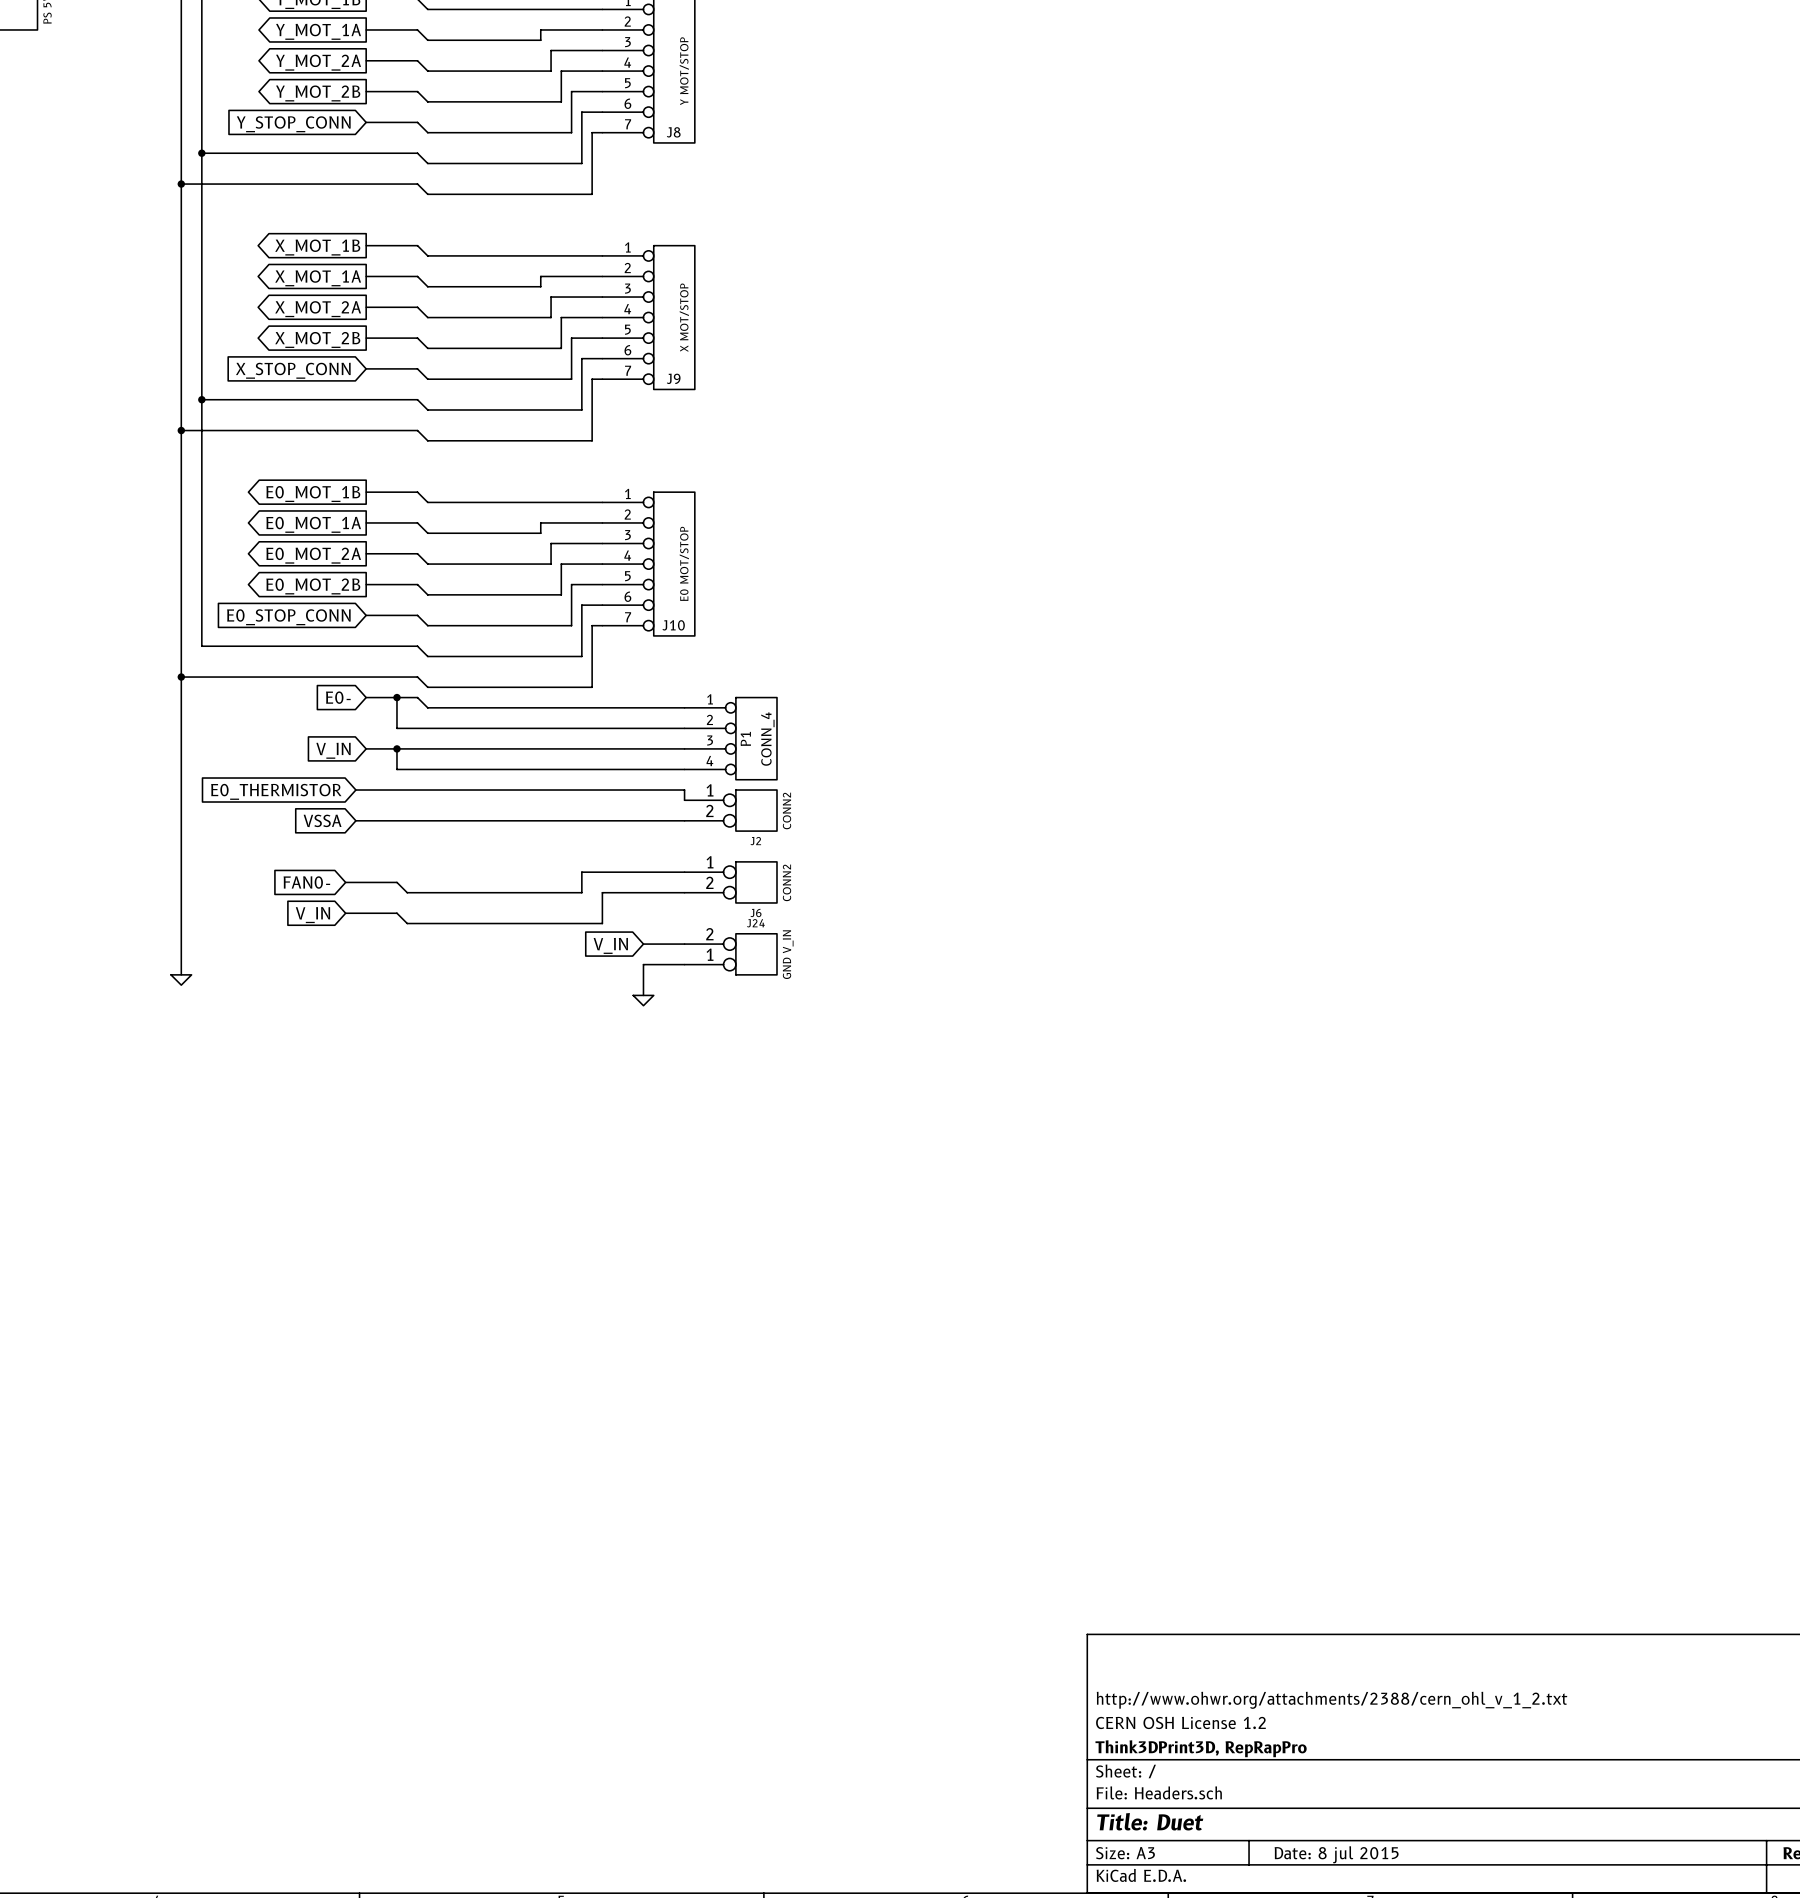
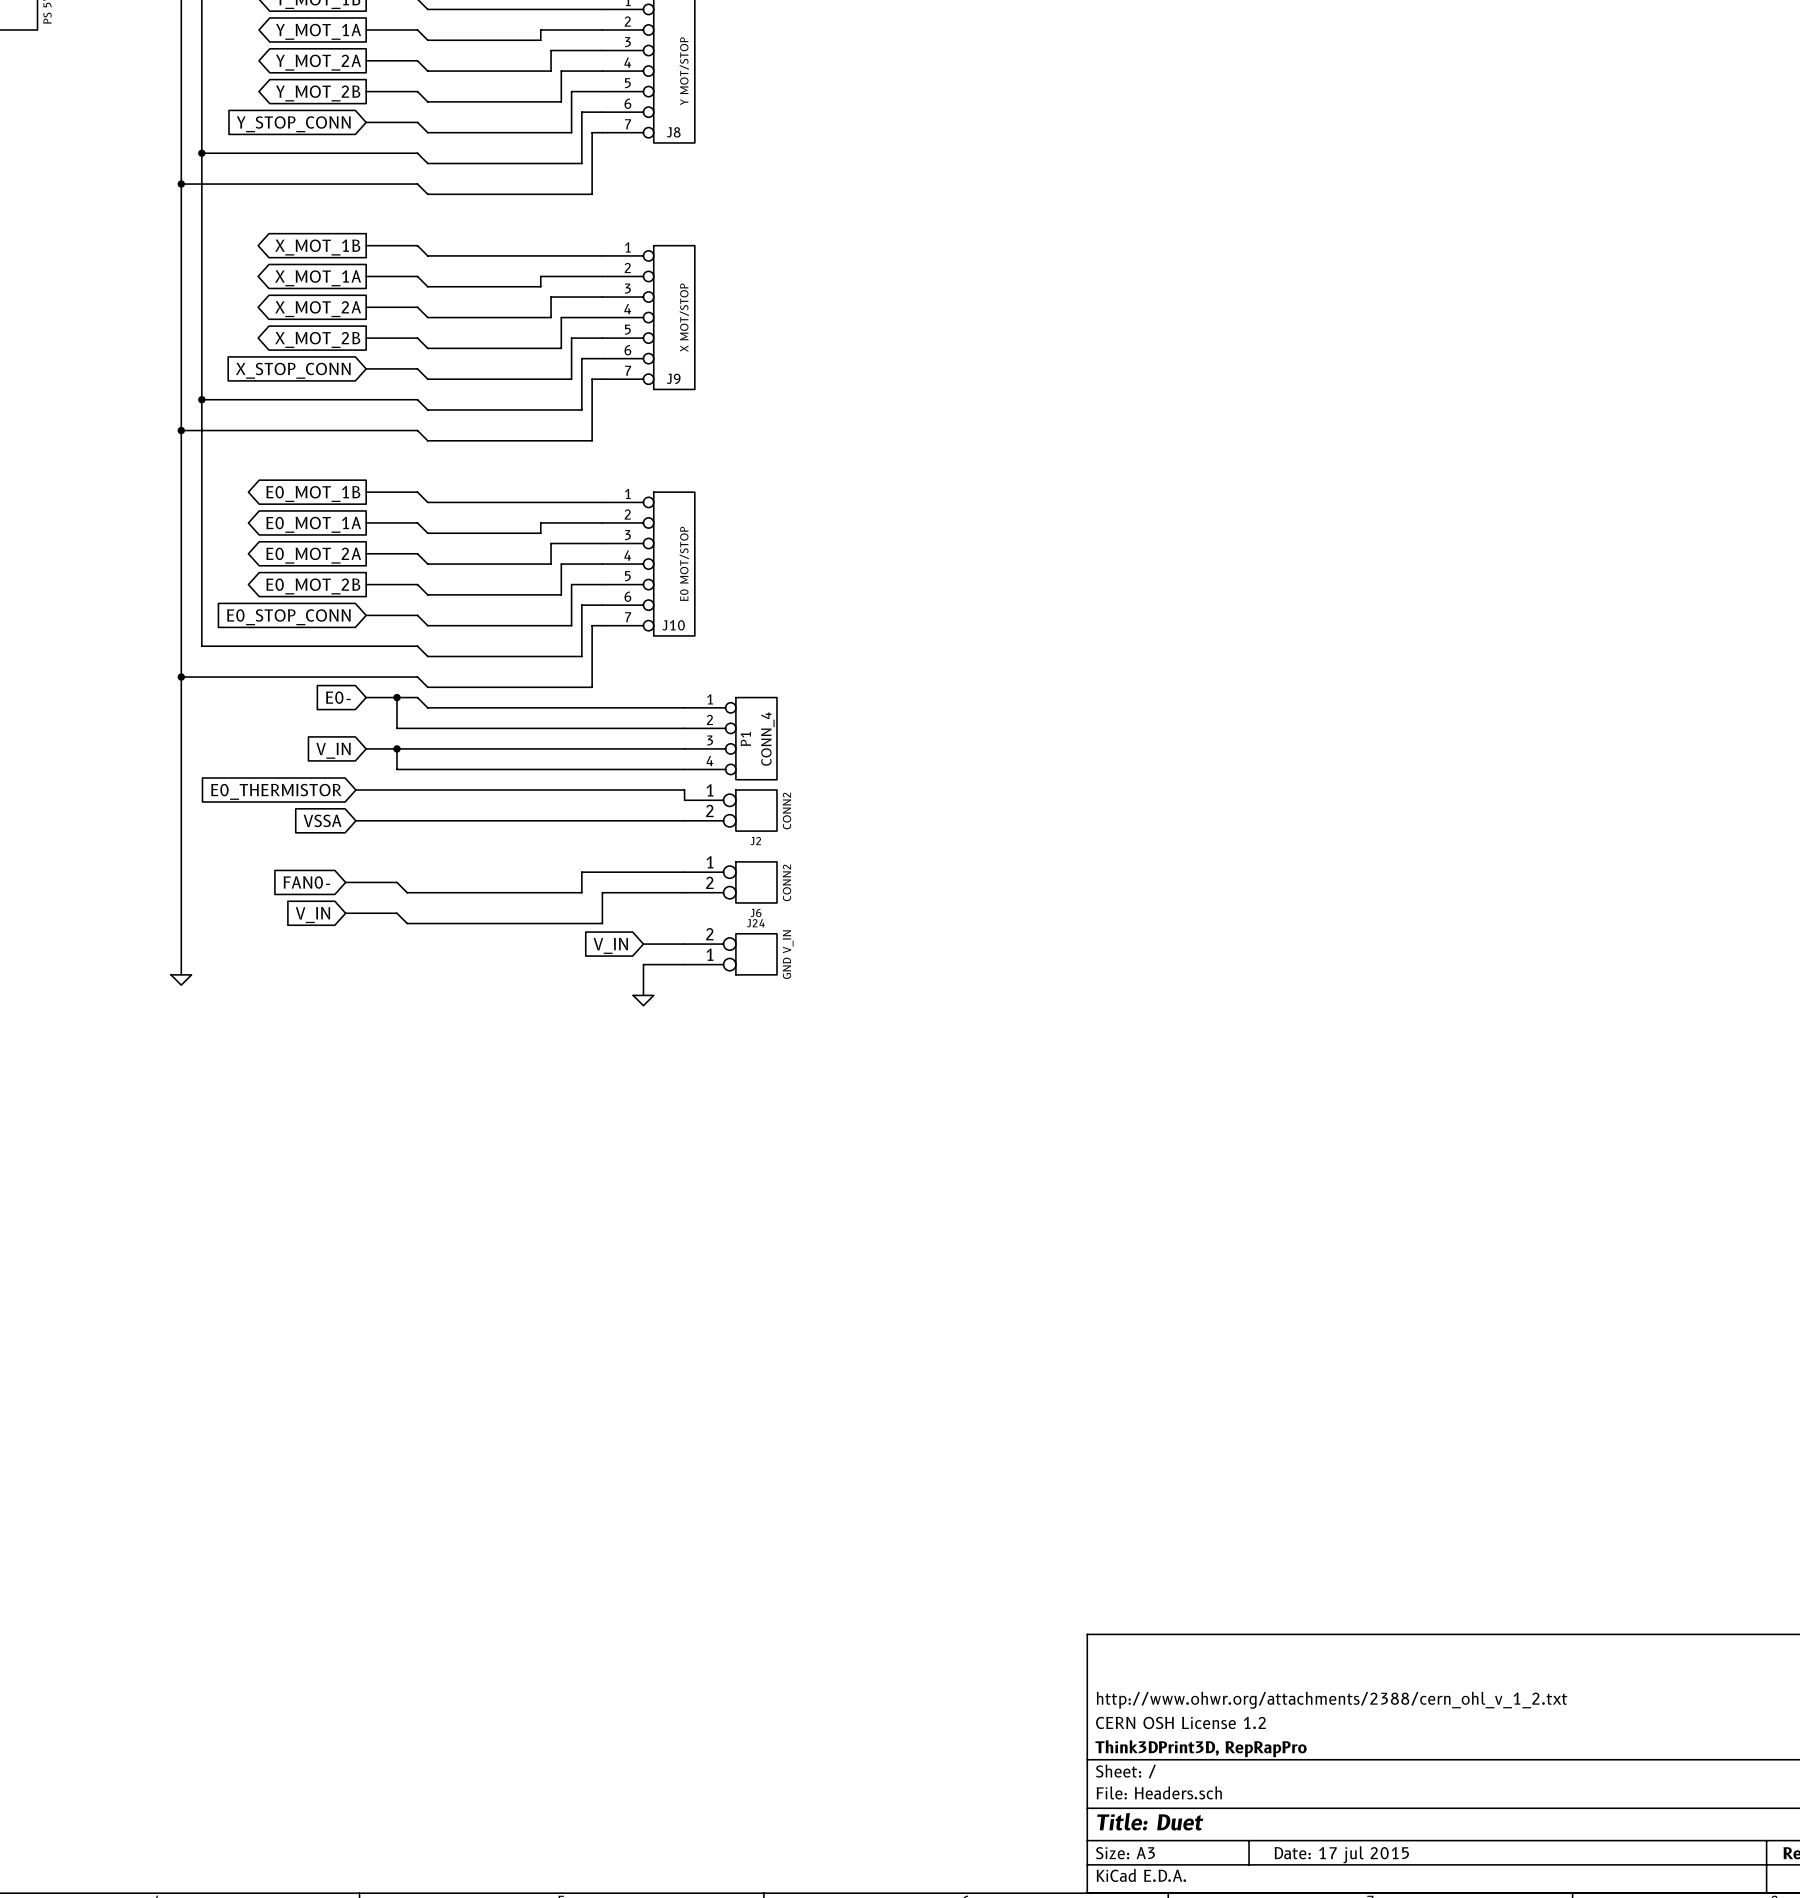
title block: Date: 8 jul 2015 (1336, 1854) -> Date: 17 jul 2015 (1341, 1854)

